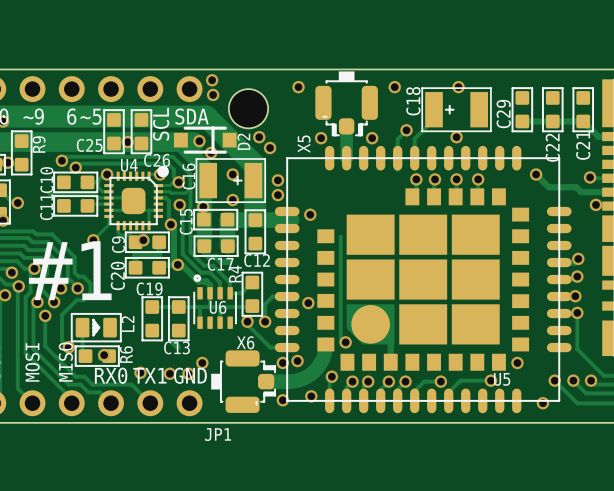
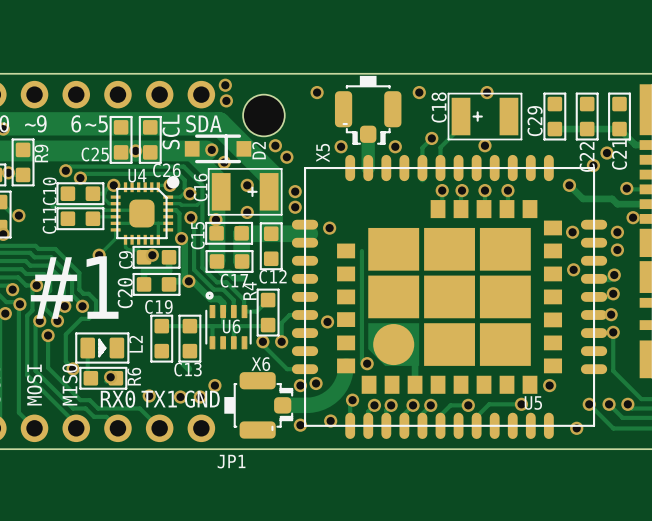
via: none -> (606, 153)
via: none -> (593, 165)
via: none -> (572, 232)
via: none -> (617, 232)
via: none -> (617, 250)
via: none -> (573, 269)

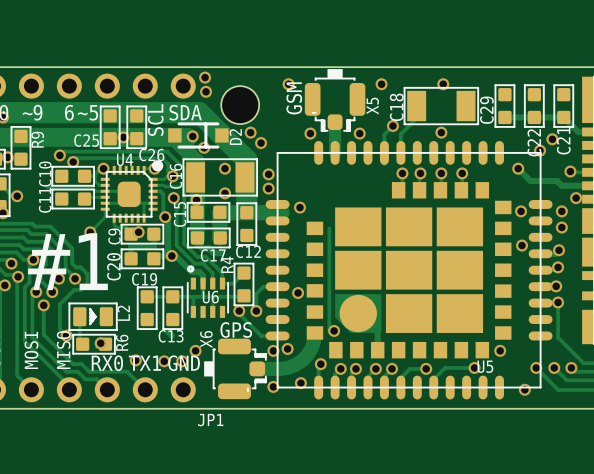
C18 footprint: [447, 92, 523, 141] -> [403, 86, 480, 126]
text: none -> GSM (294, 98)
X5 name position: X5 (323, 153) -> X5 (372, 106)
C16 footprint: [207, 168, 283, 216] -> [182, 158, 259, 197]
text: none -> GPS (236, 330)
X6 name rotation: 0° (260, 364) -> 90° counterclockwise (206, 339)
X6 name position: X6 (260, 364) -> X6 (206, 339)

